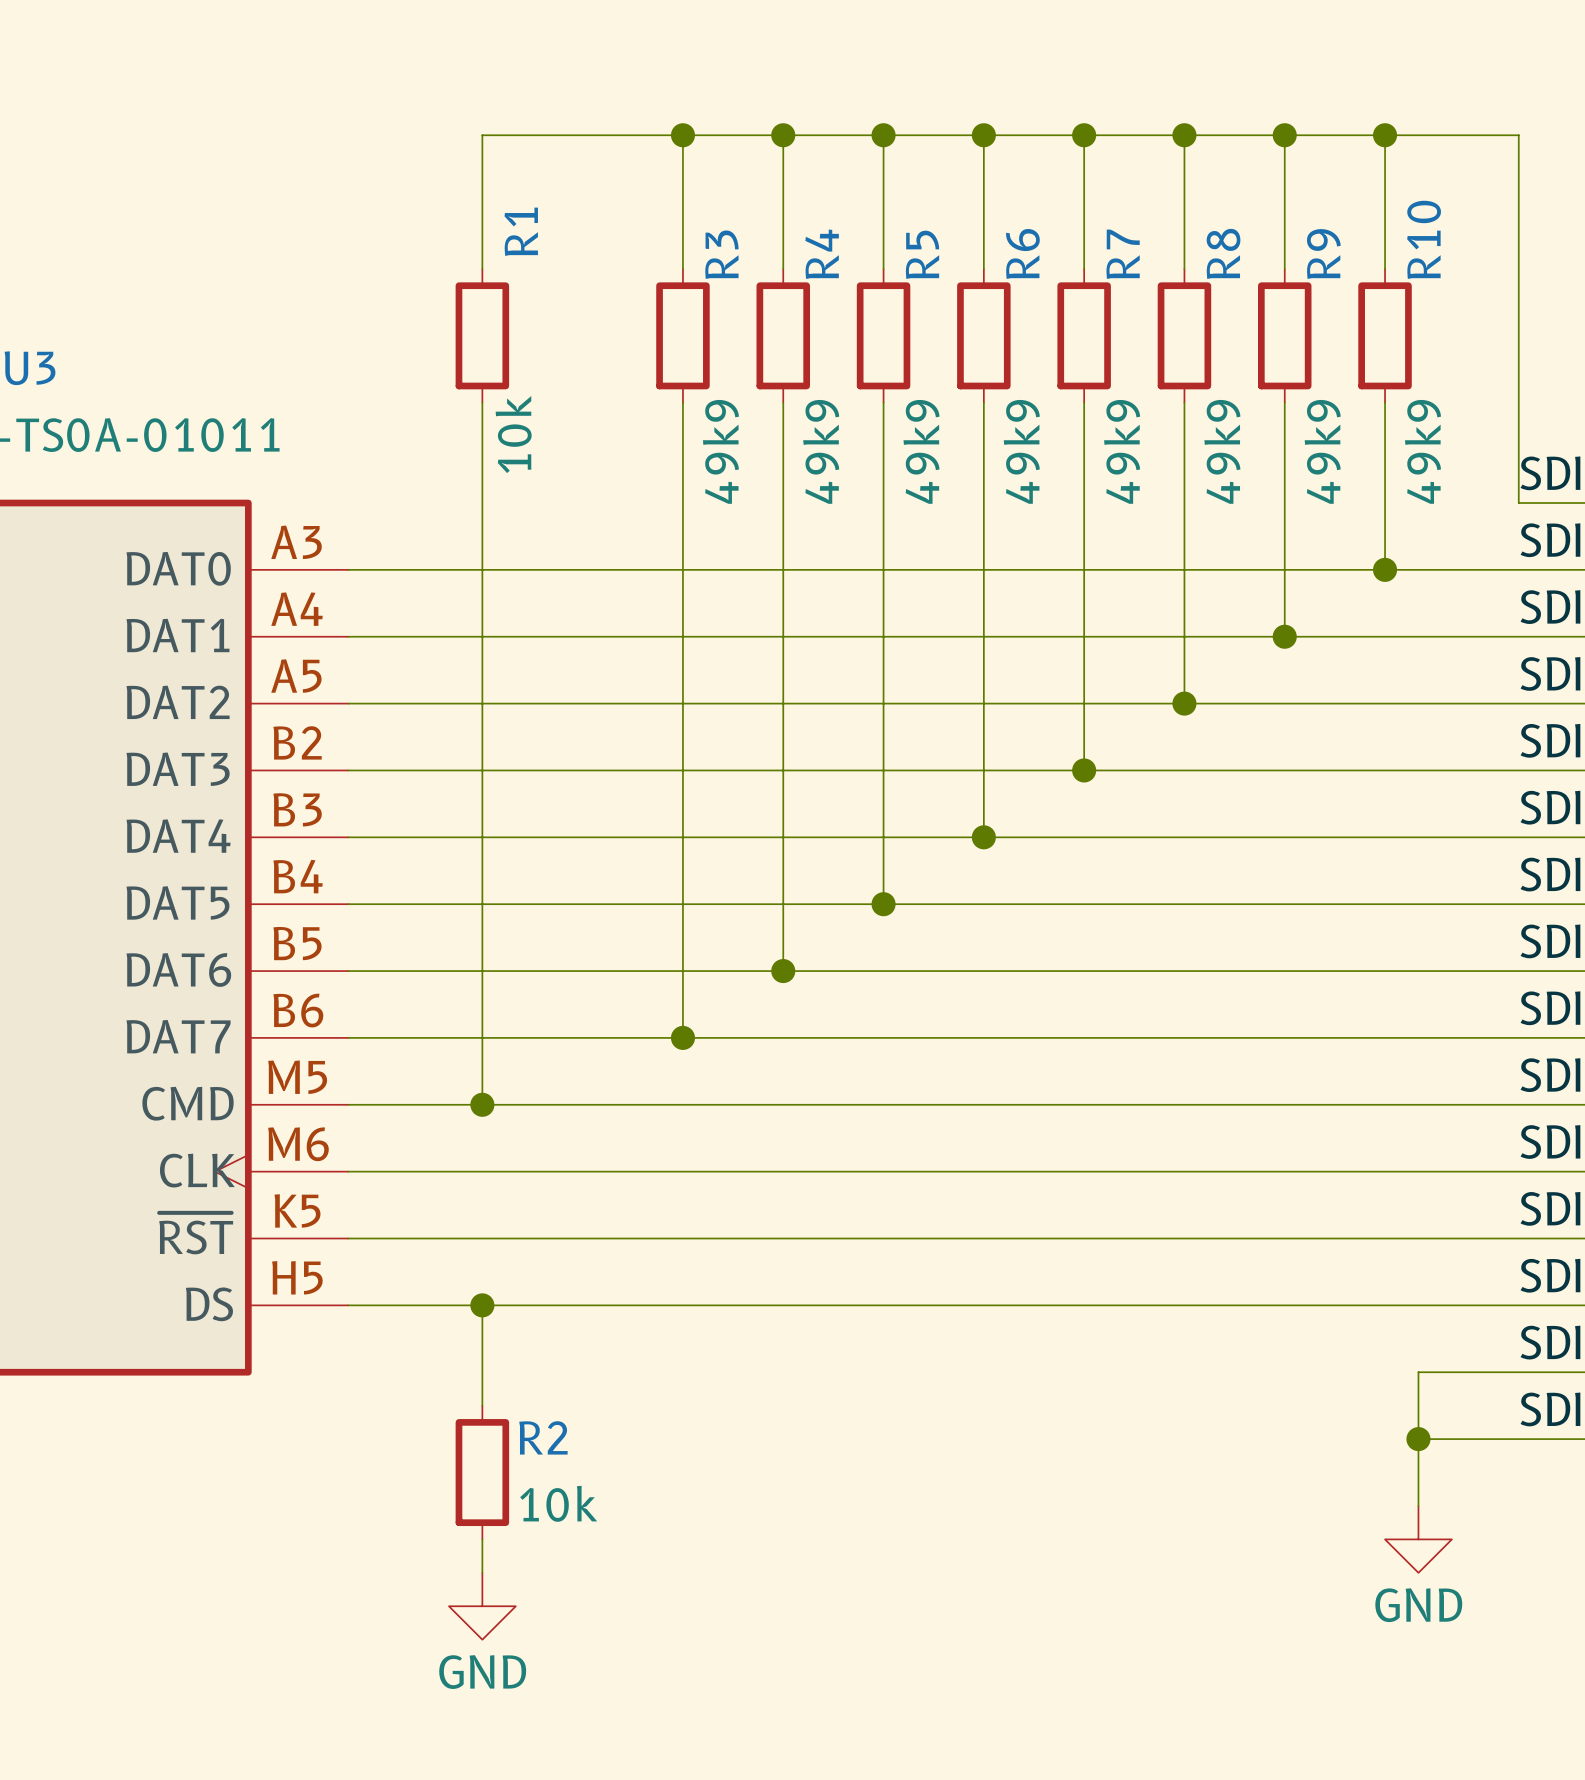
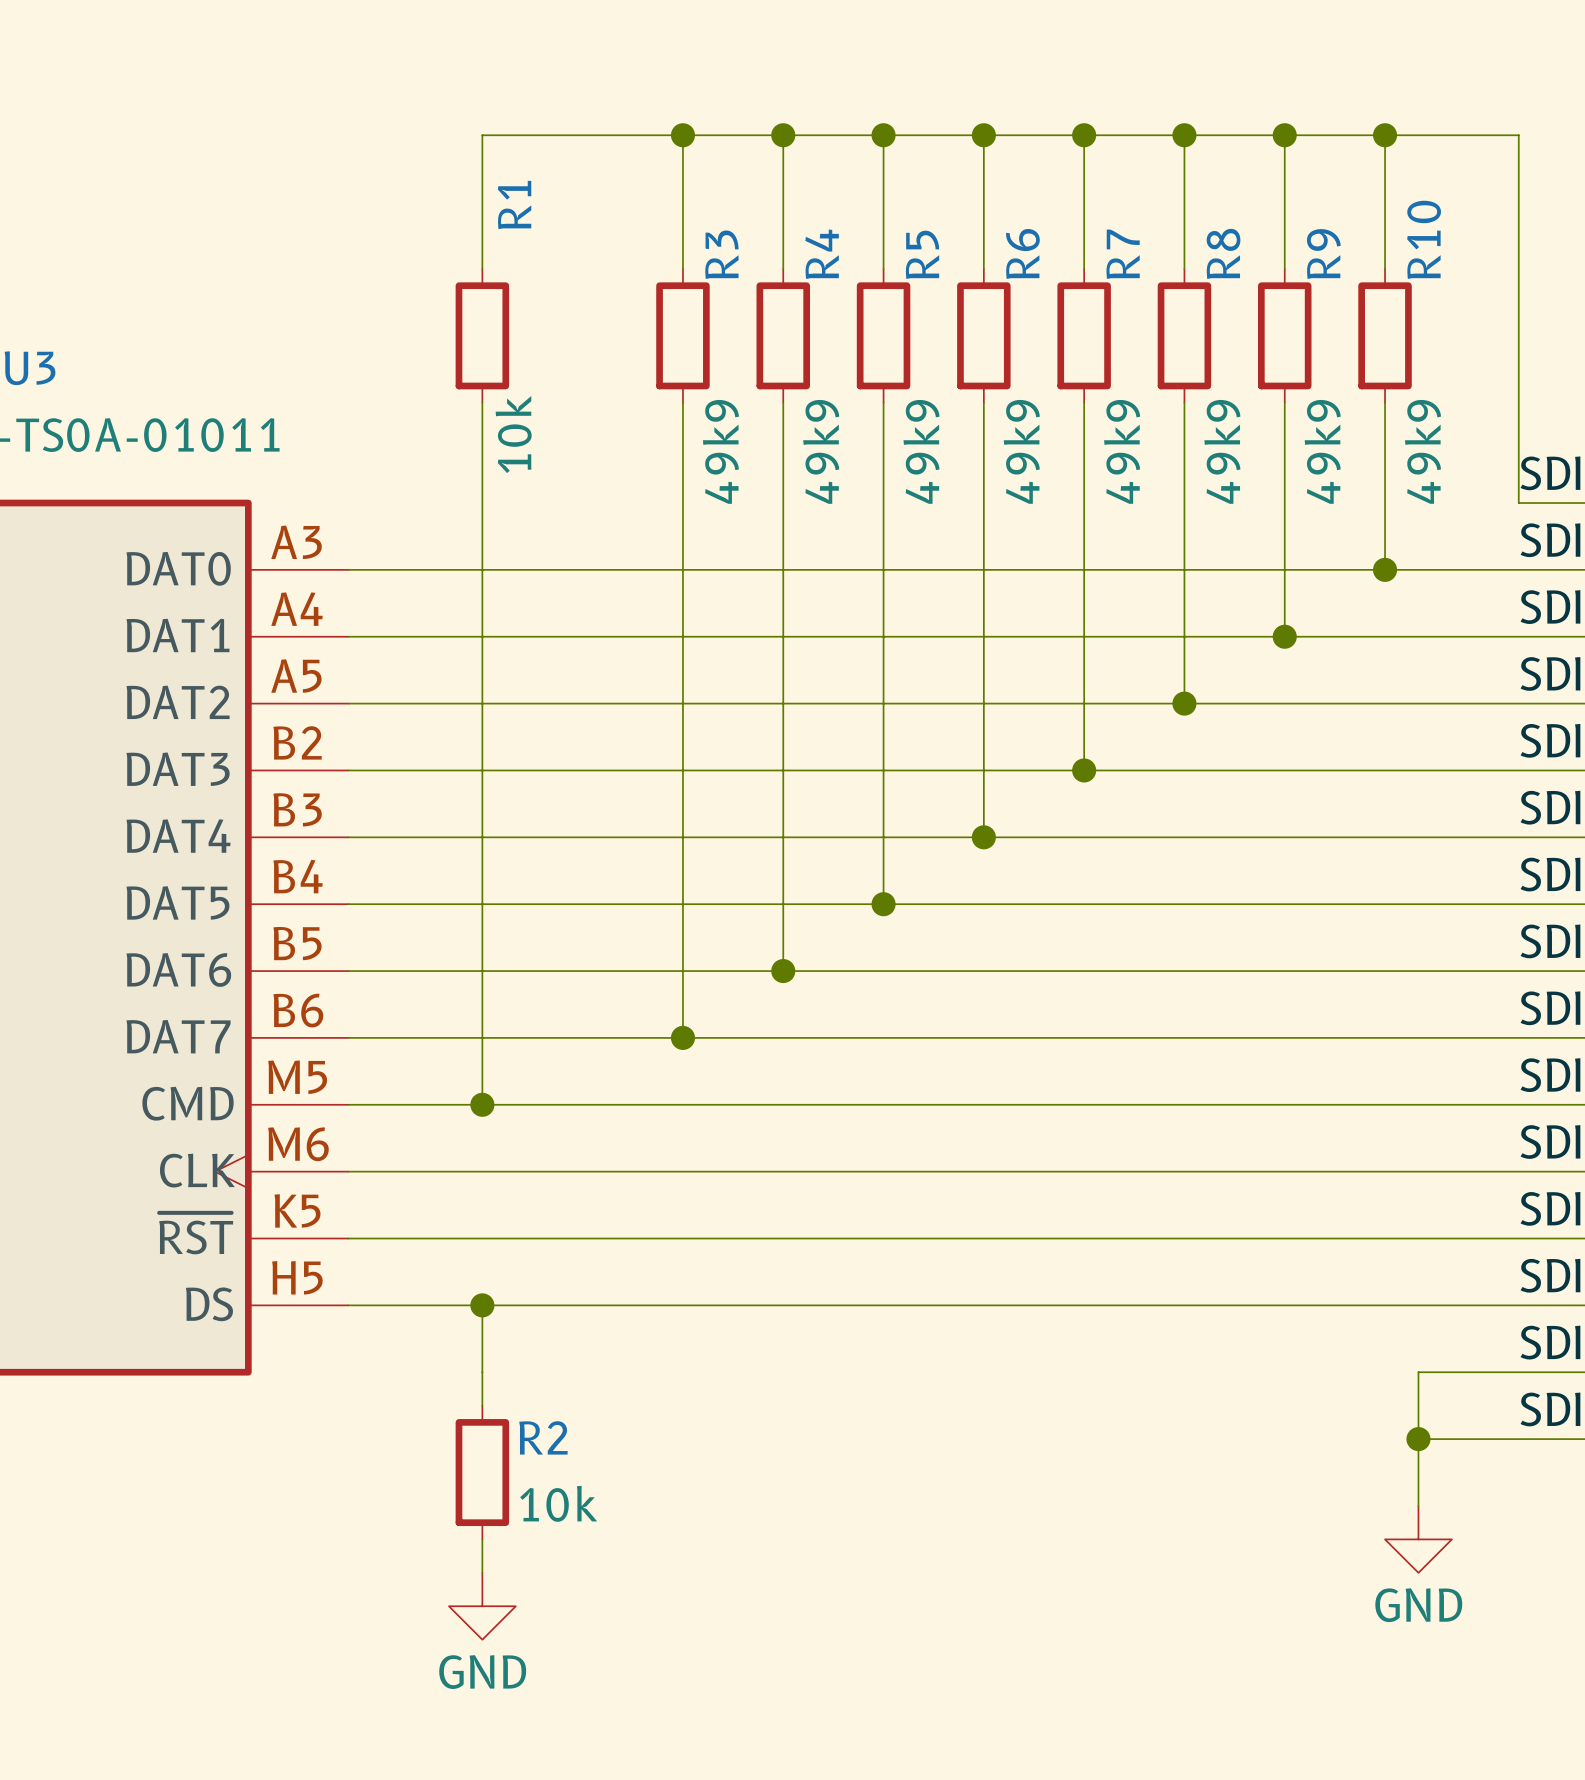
R1 name position: R1 (521, 231) -> R1 (514, 205)

